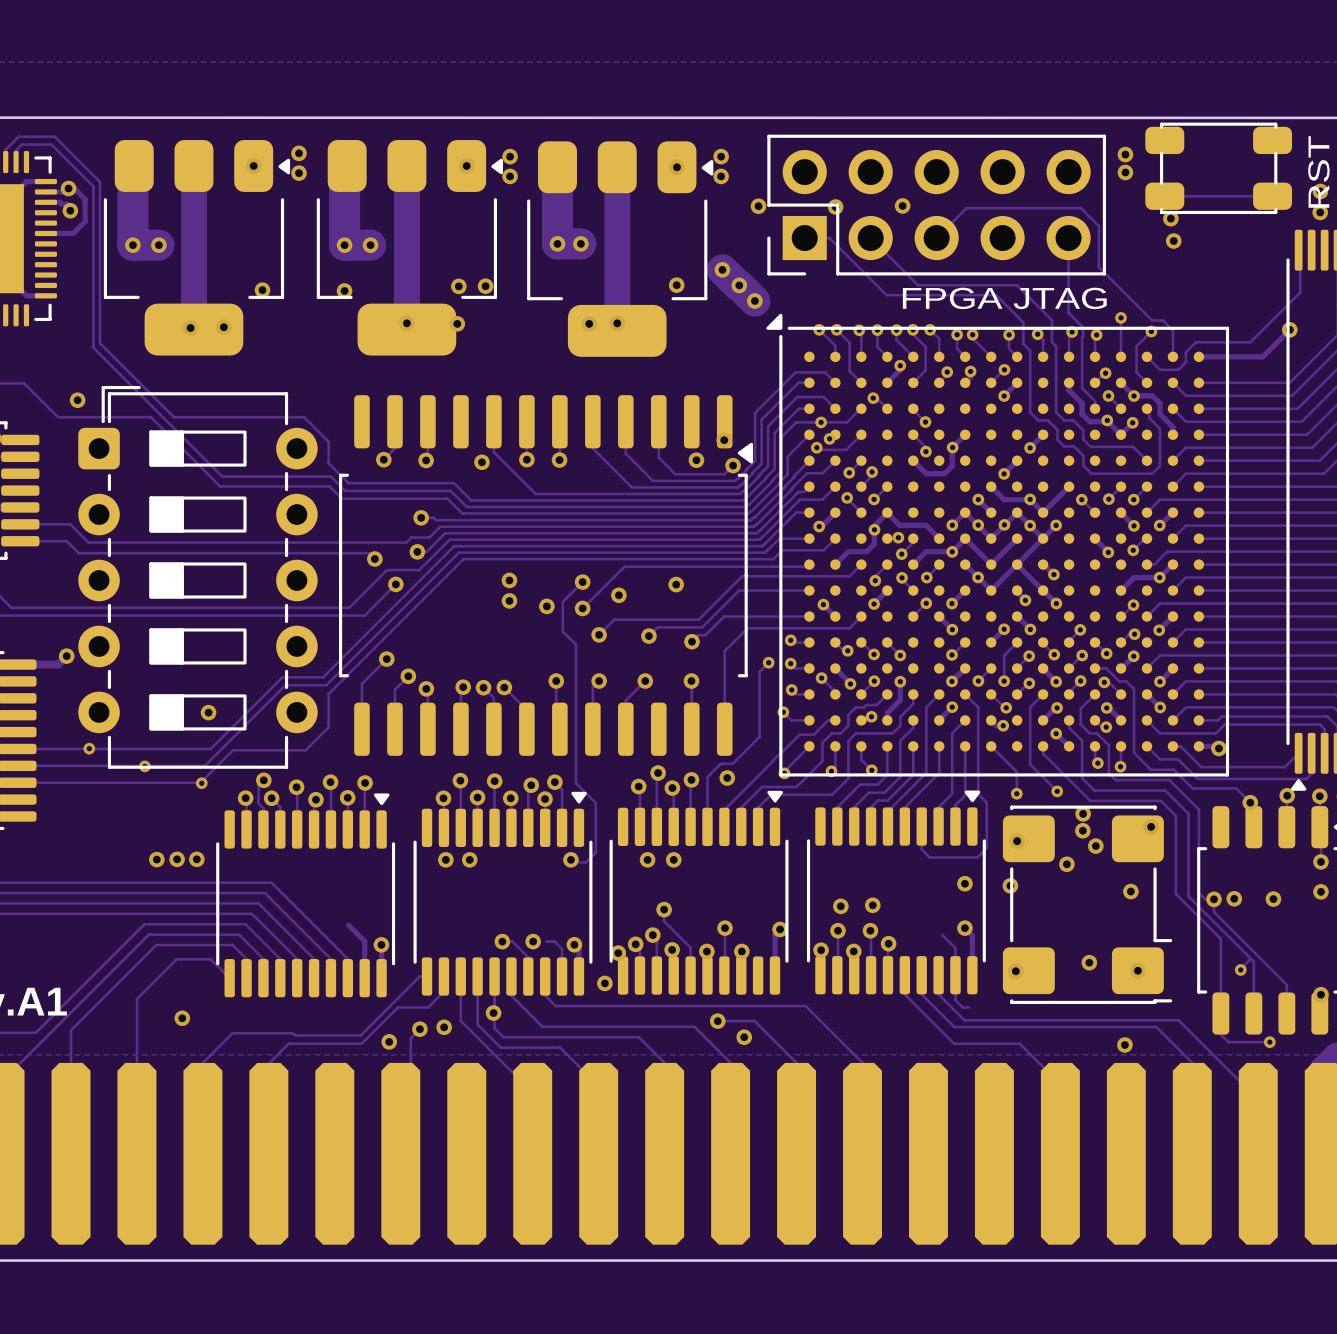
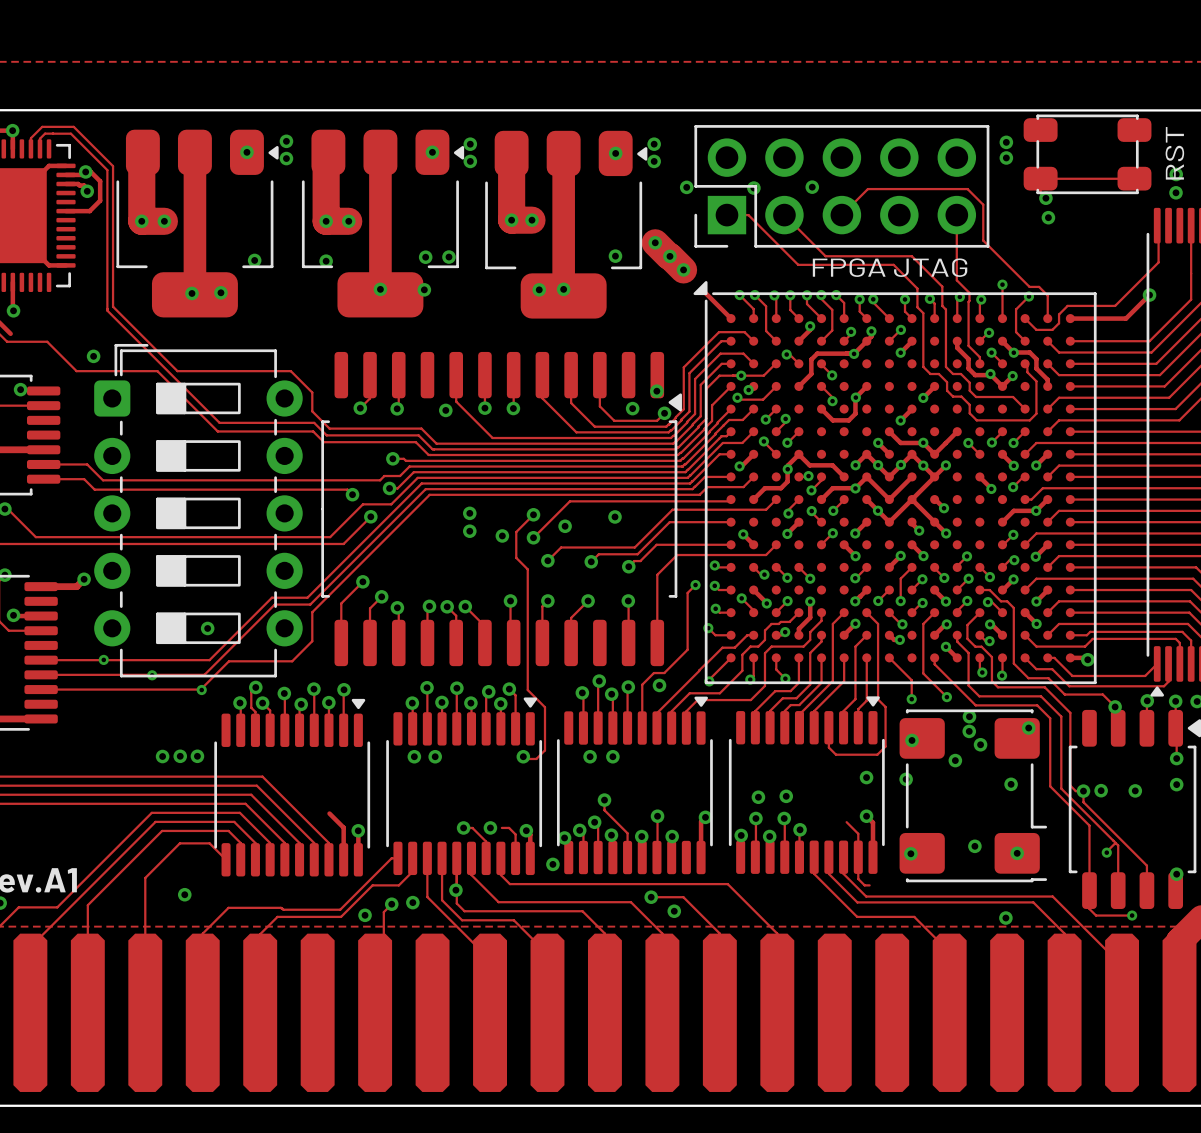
track: none -> (703, 290) (731, 318)
track: none -> (866, 341) (852, 353)
track: none -> (853, 353) (817, 353) (811, 359) (811, 374) (798, 386)
via: none -> (854, 353)

